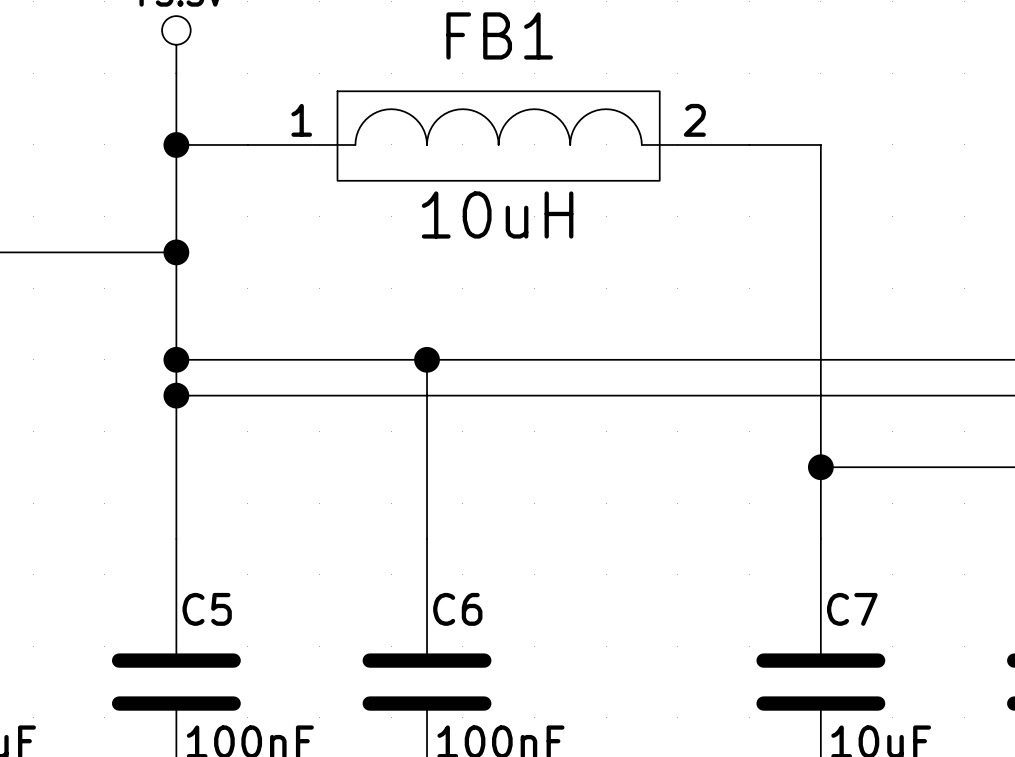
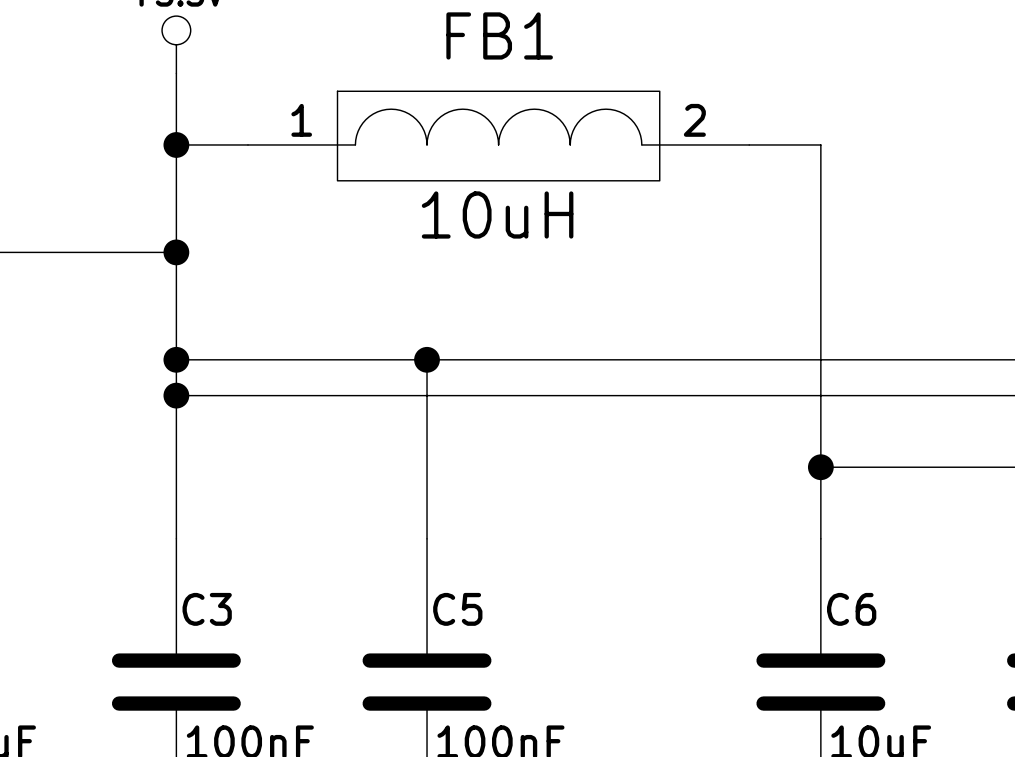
C5 name: C5 (207, 609) -> C3 (207, 609)
C6 name: C6 (457, 609) -> C5 (457, 609)
C7 name: C7 (852, 609) -> C6 (851, 609)

